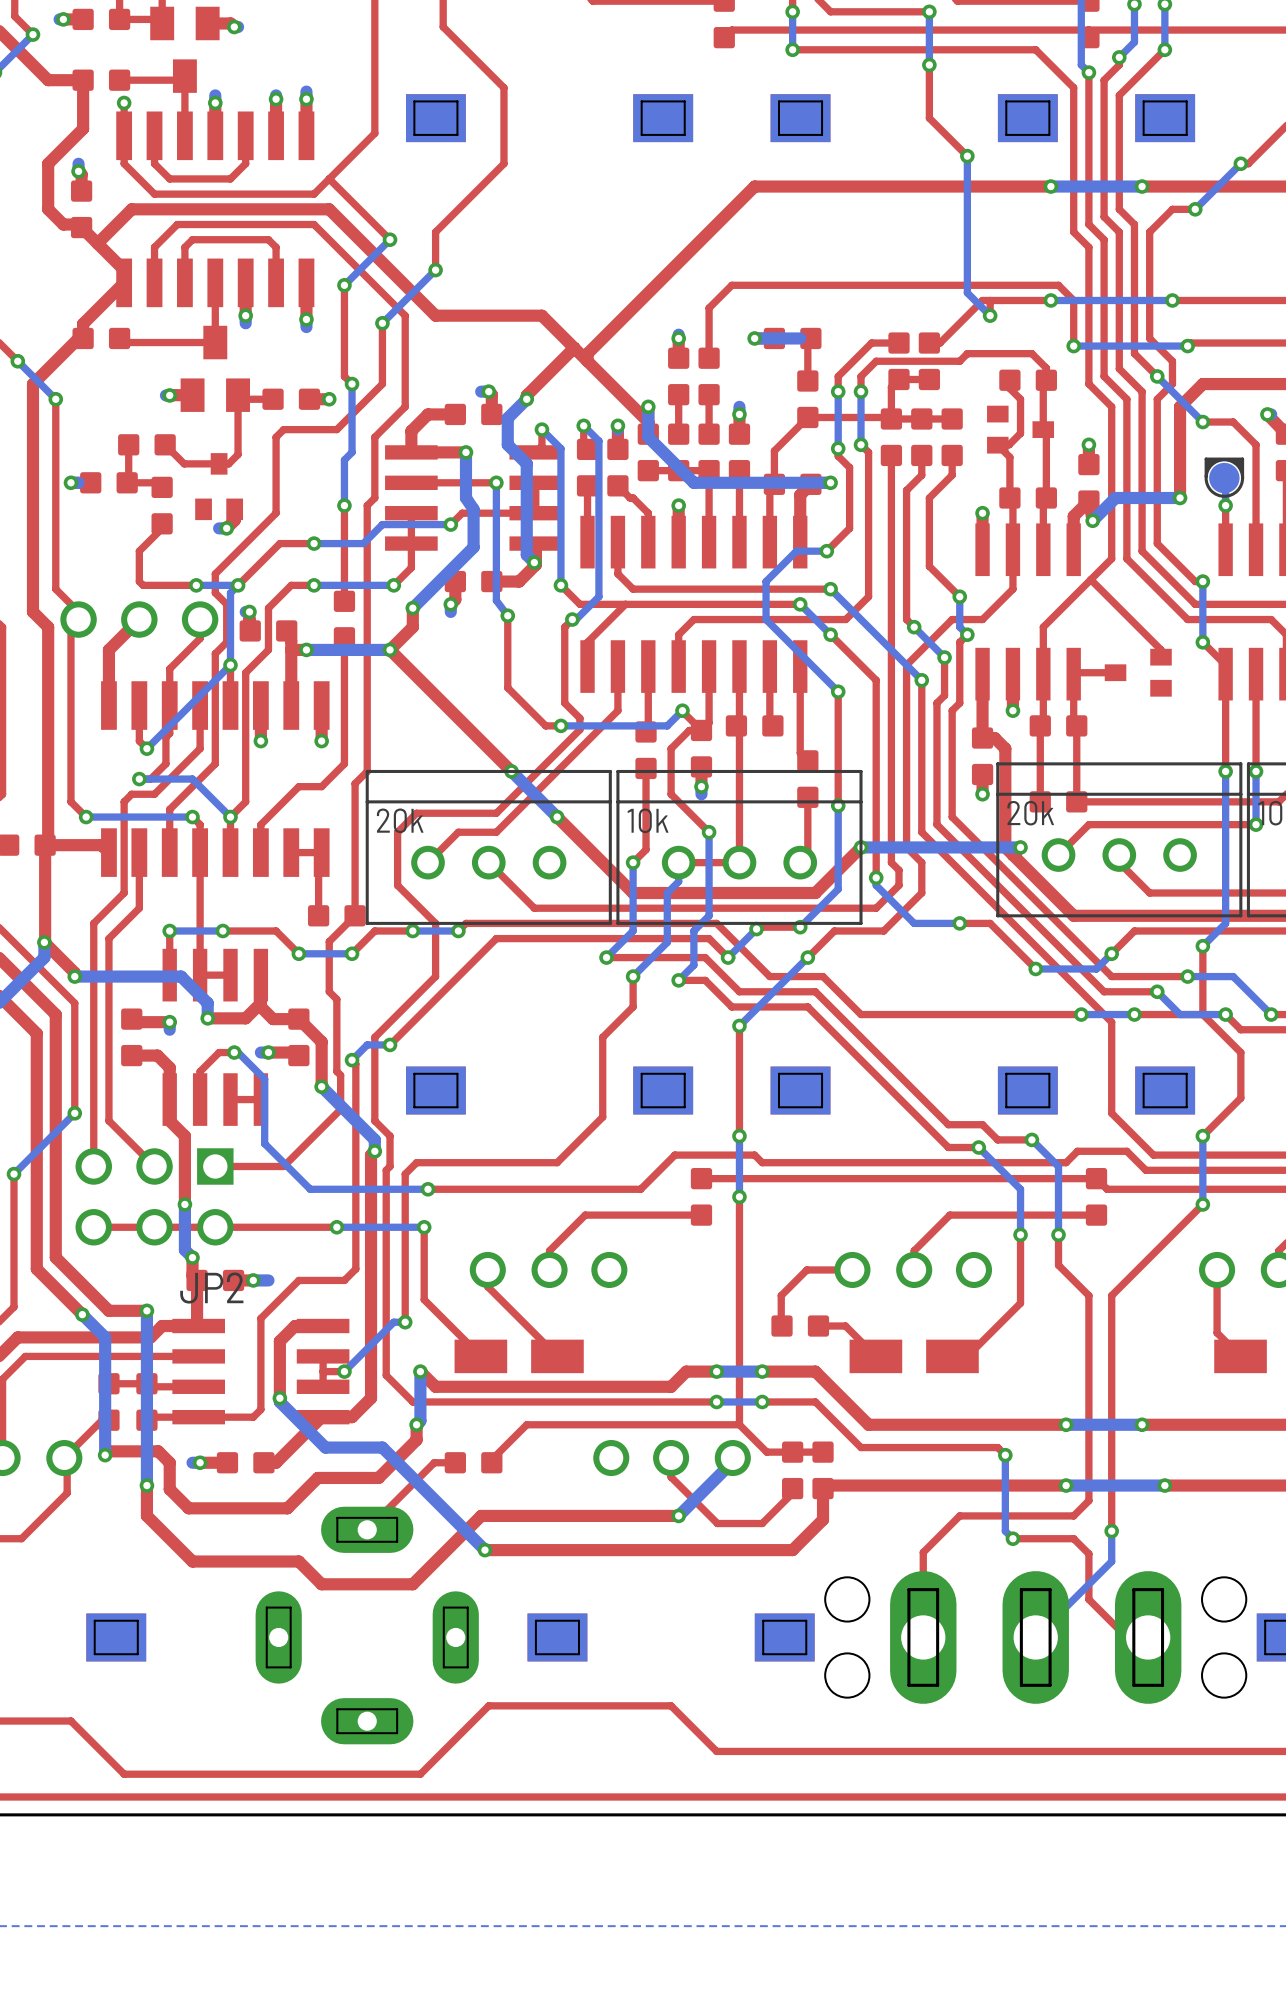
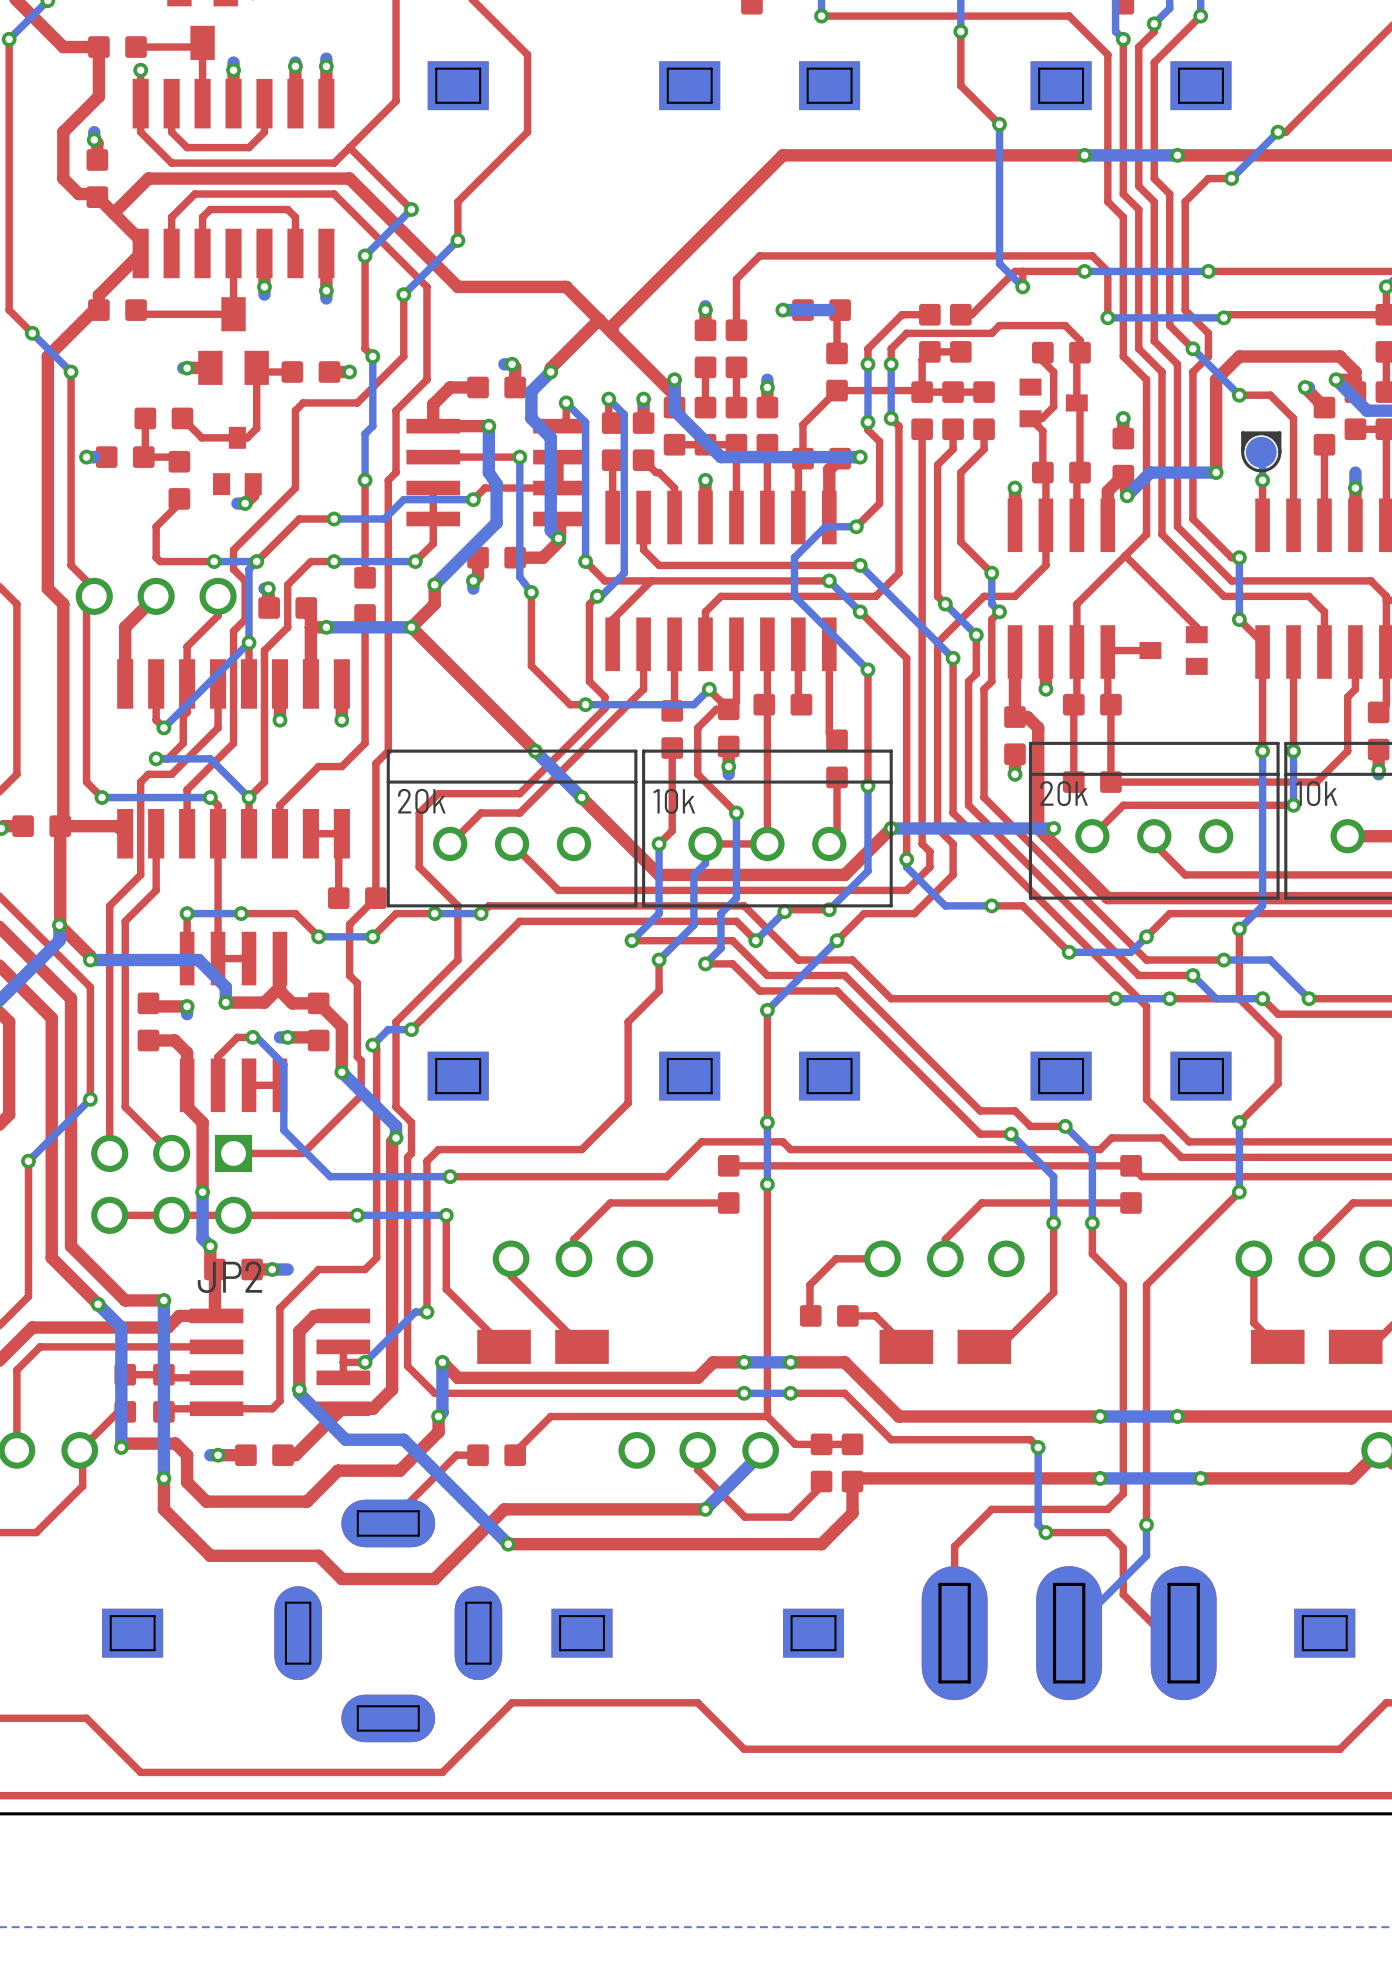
part footprint: [255, 1506, 479, 1745] -> [274, 1499, 503, 1743]
part footprint: [825, 1571, 1247, 1704] -> [921, 1566, 1217, 1701]

